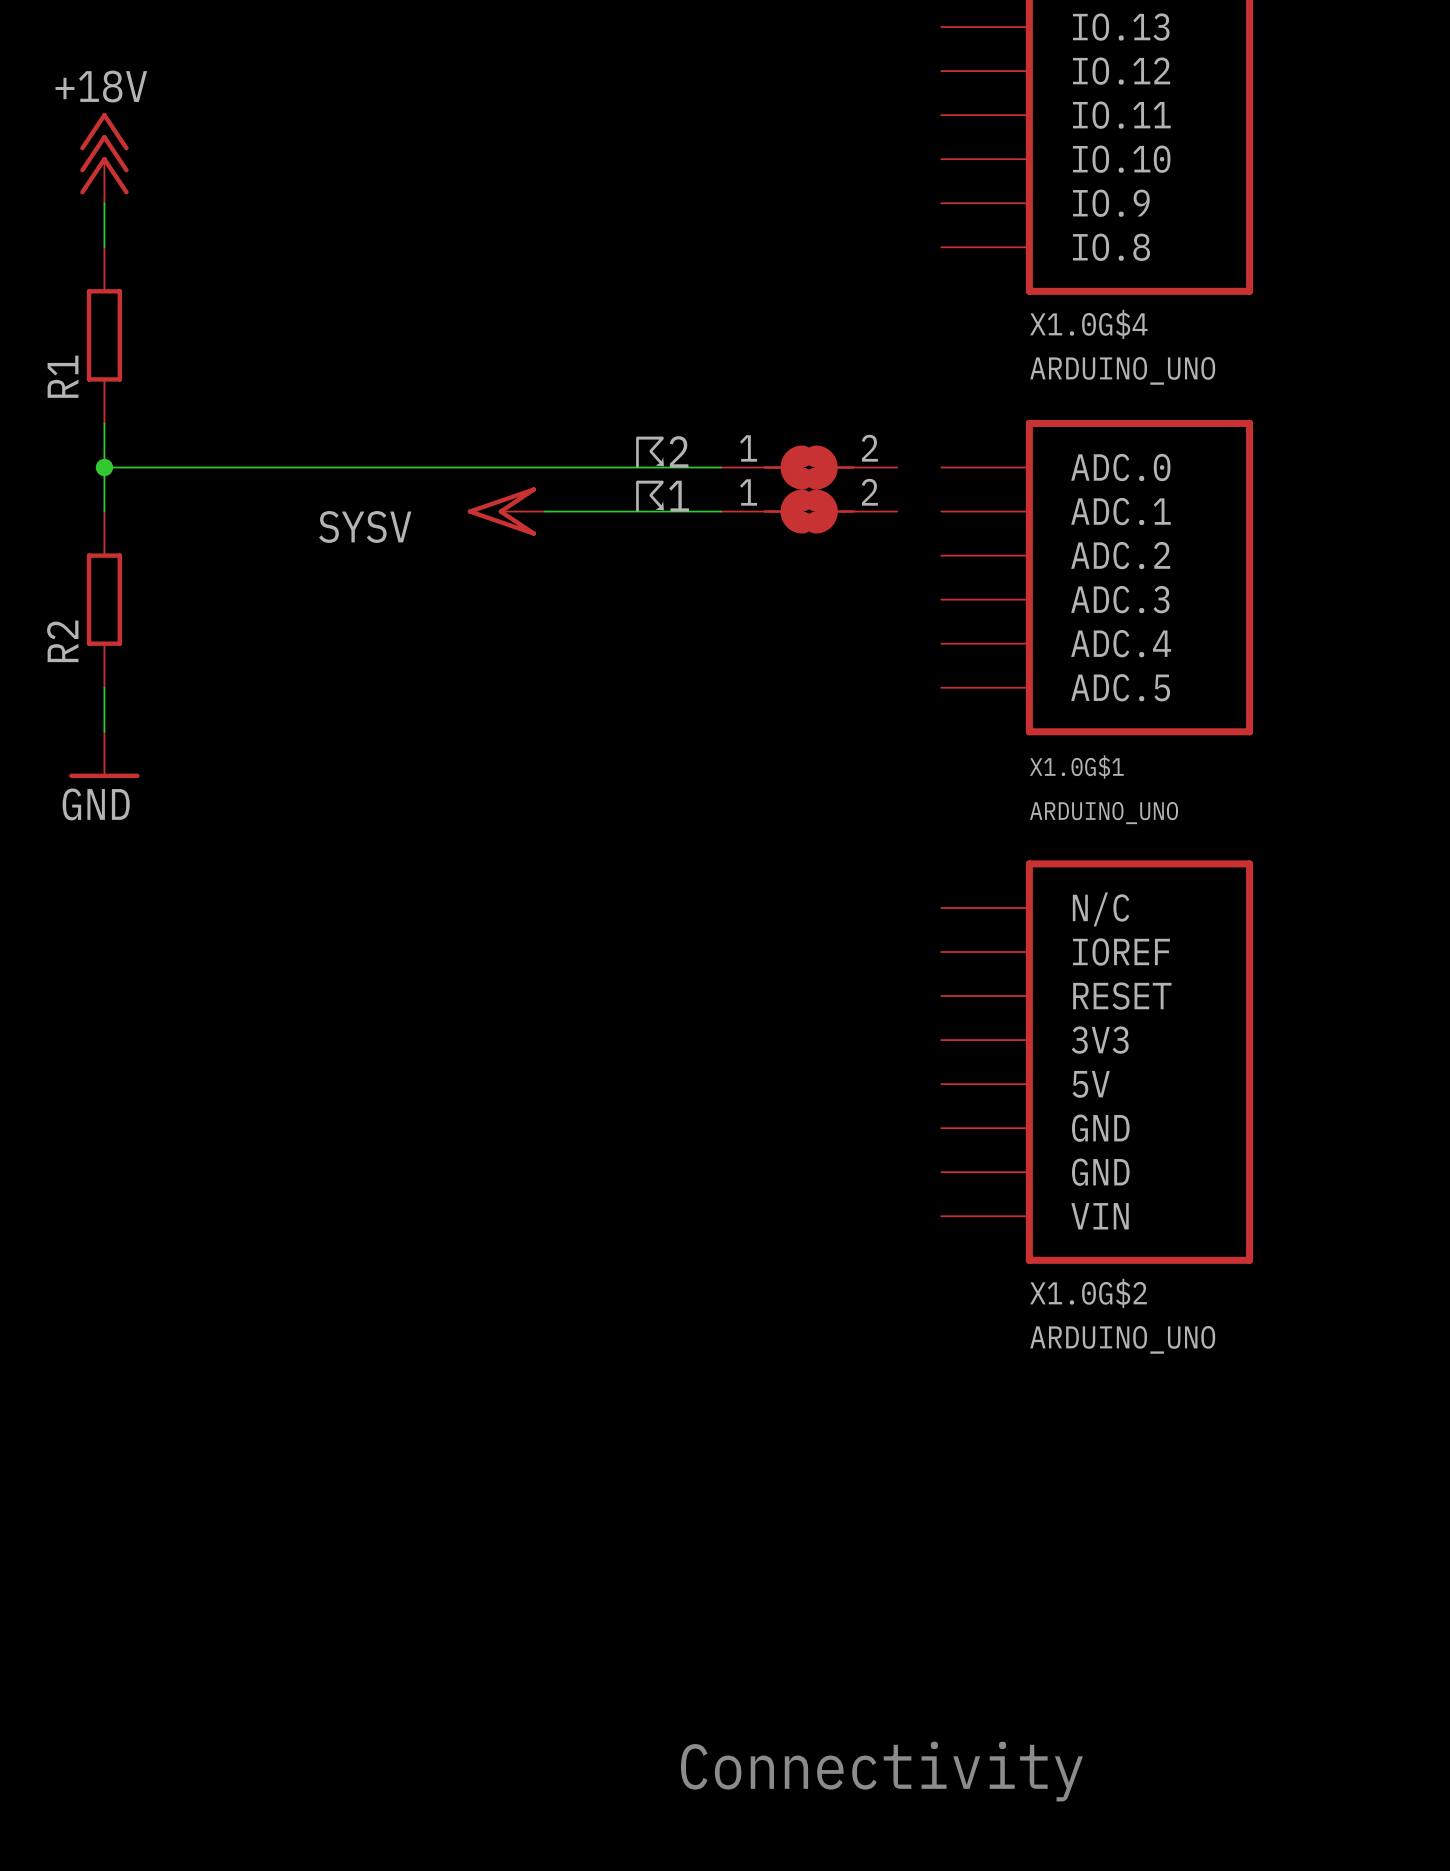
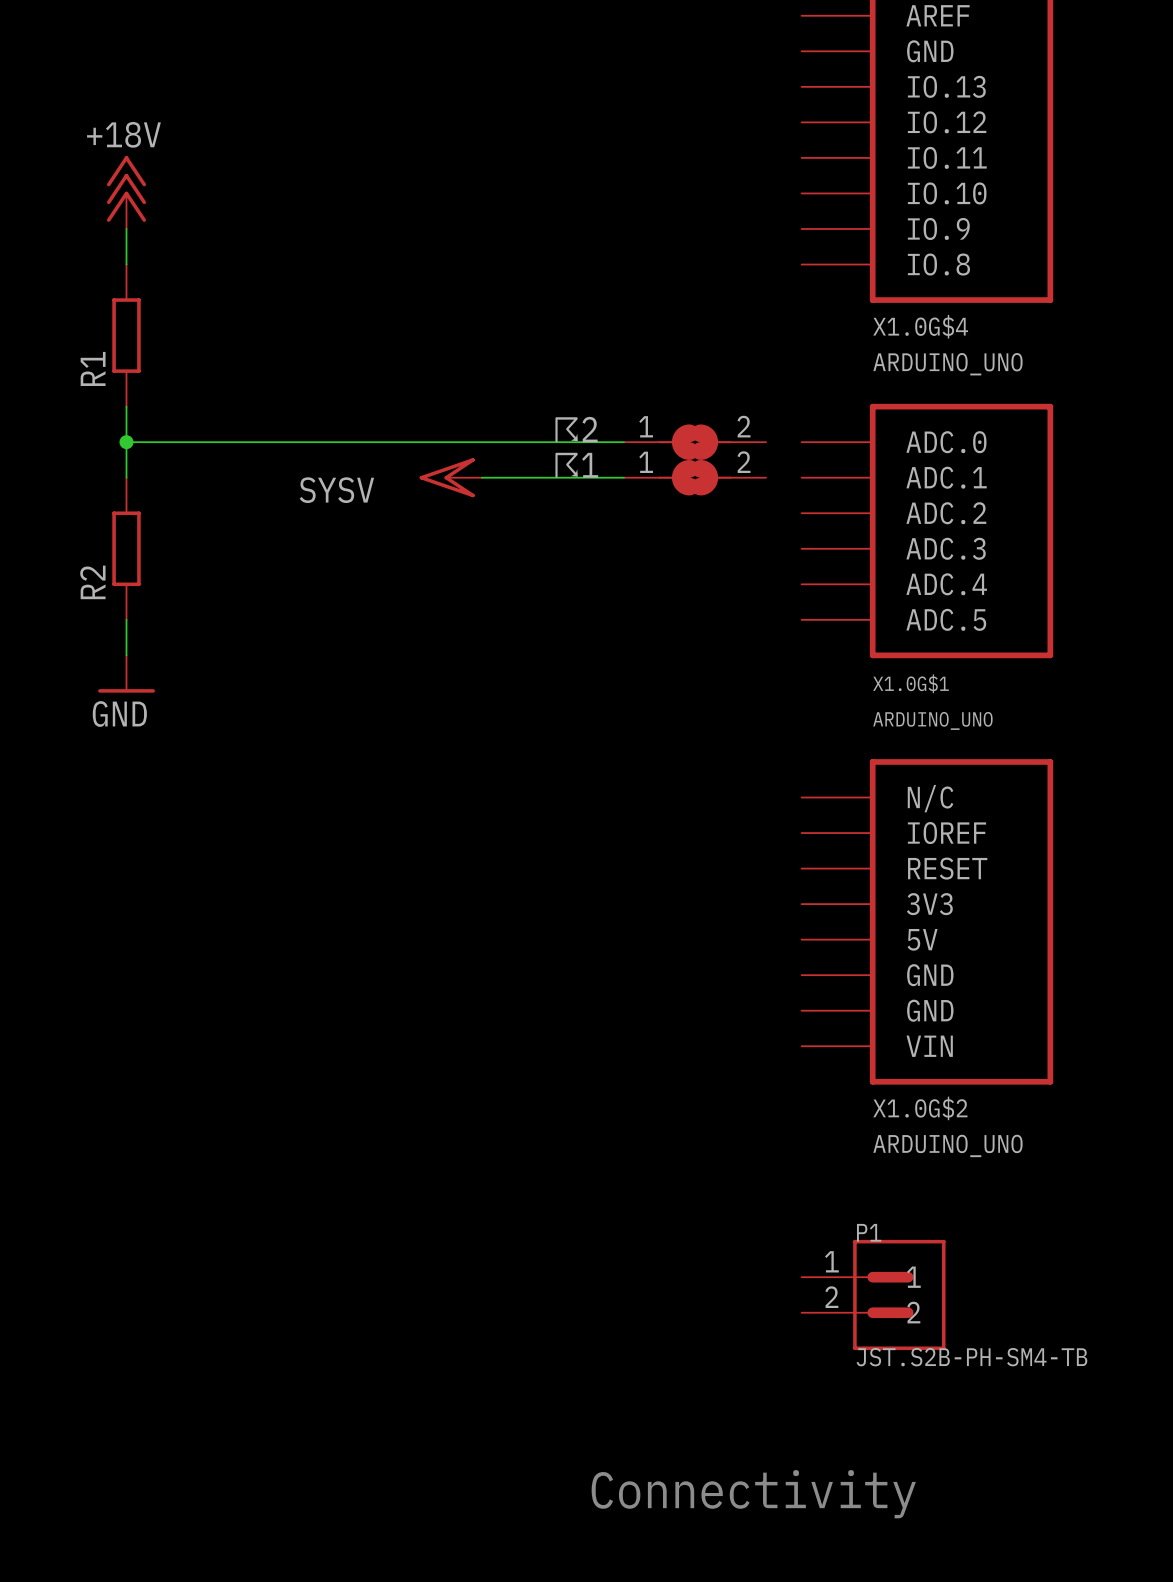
P1: none -> JST.S2B-PH-SM4-TB (873, 1294)

